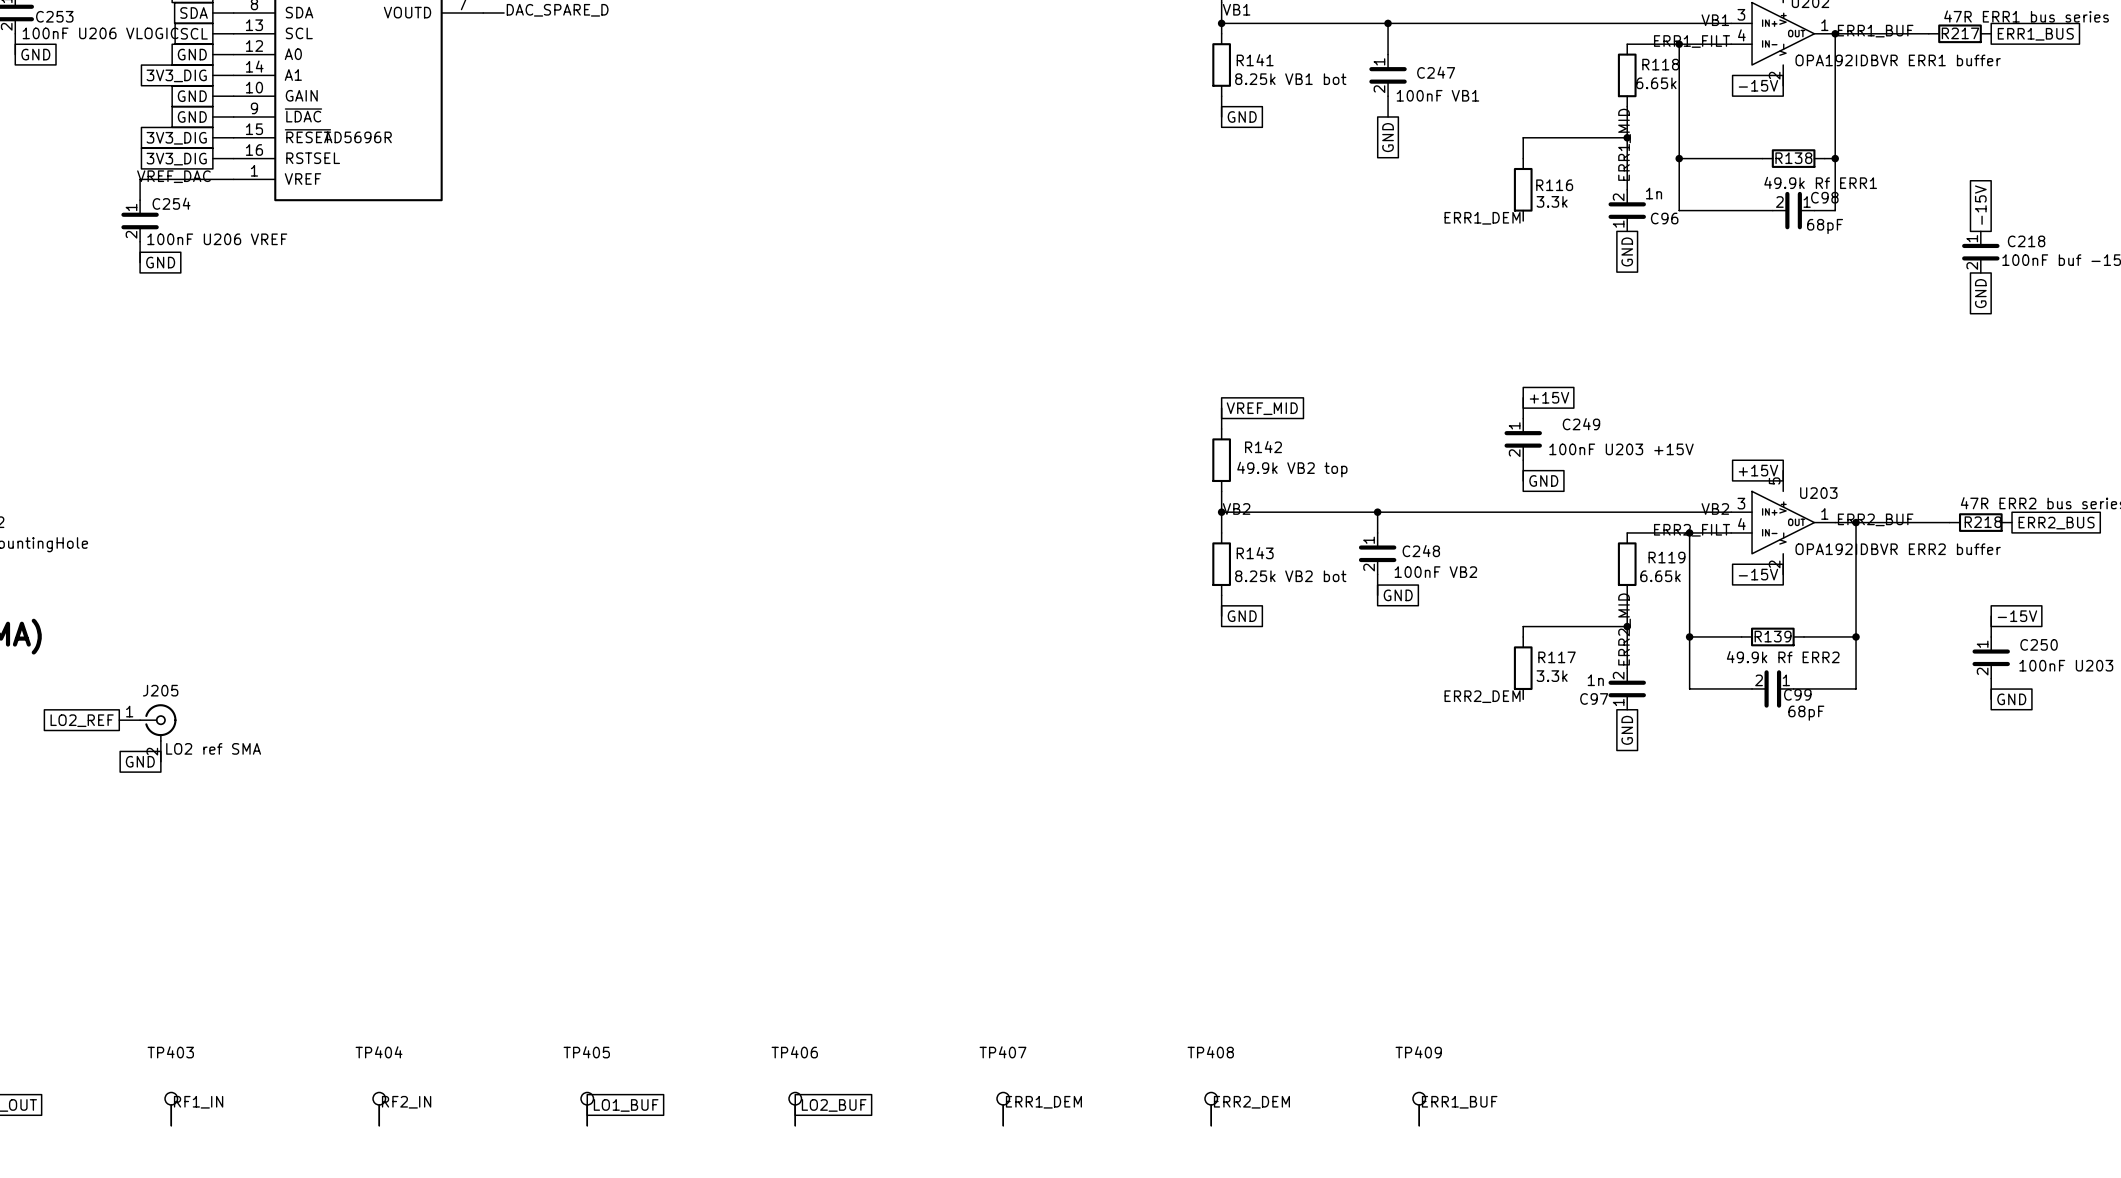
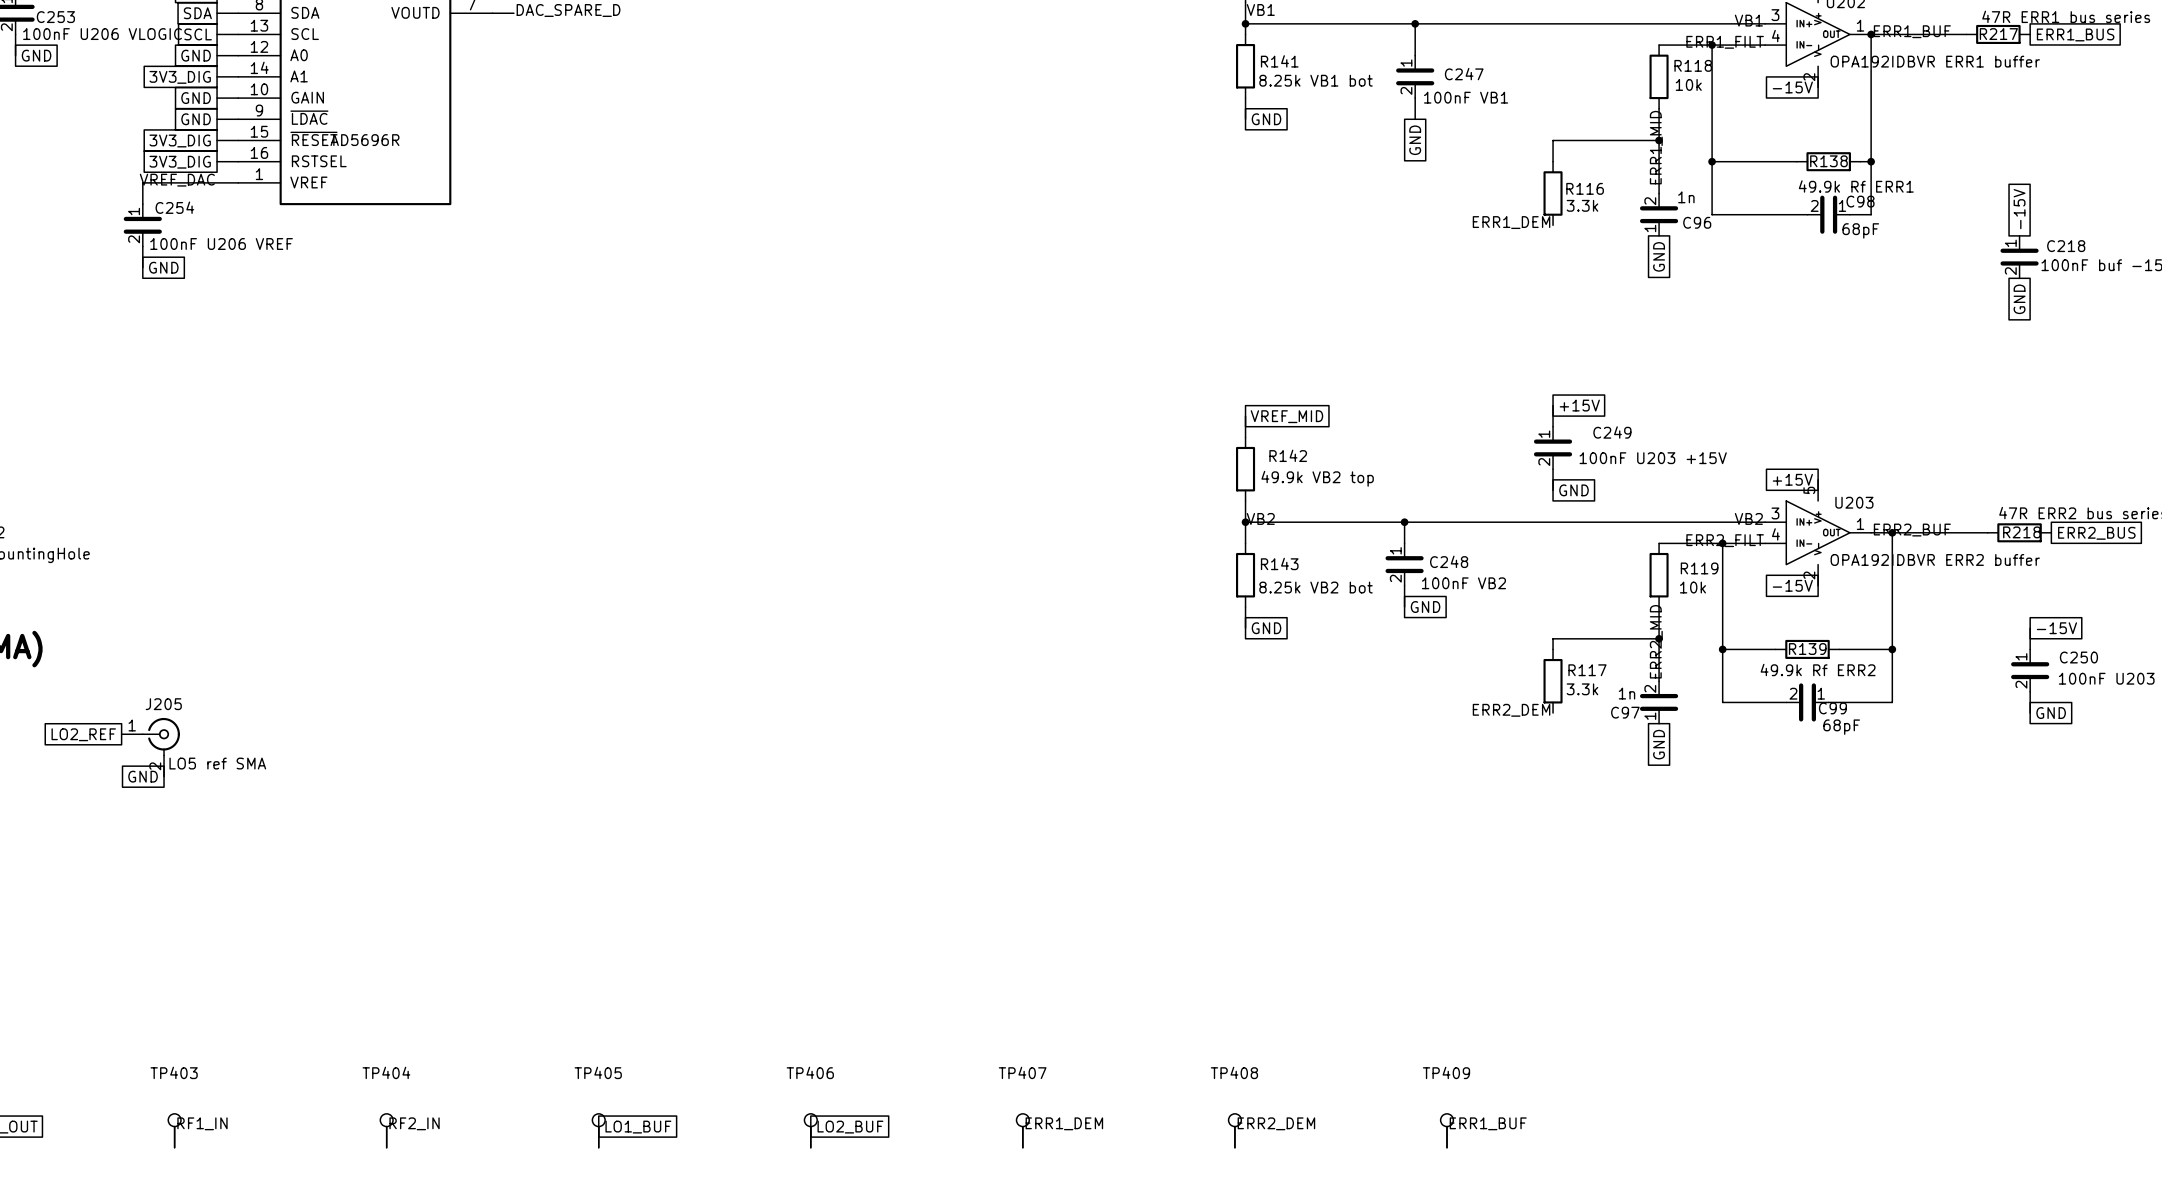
R118 value: 6.65k (1656, 83) -> 10k (1688, 84)
R119 value: 6.65k (1660, 576) -> 10k (1692, 587)
J205 value: LO2 ref SMA (213, 748) -> LO5 ref SMA (217, 763)

